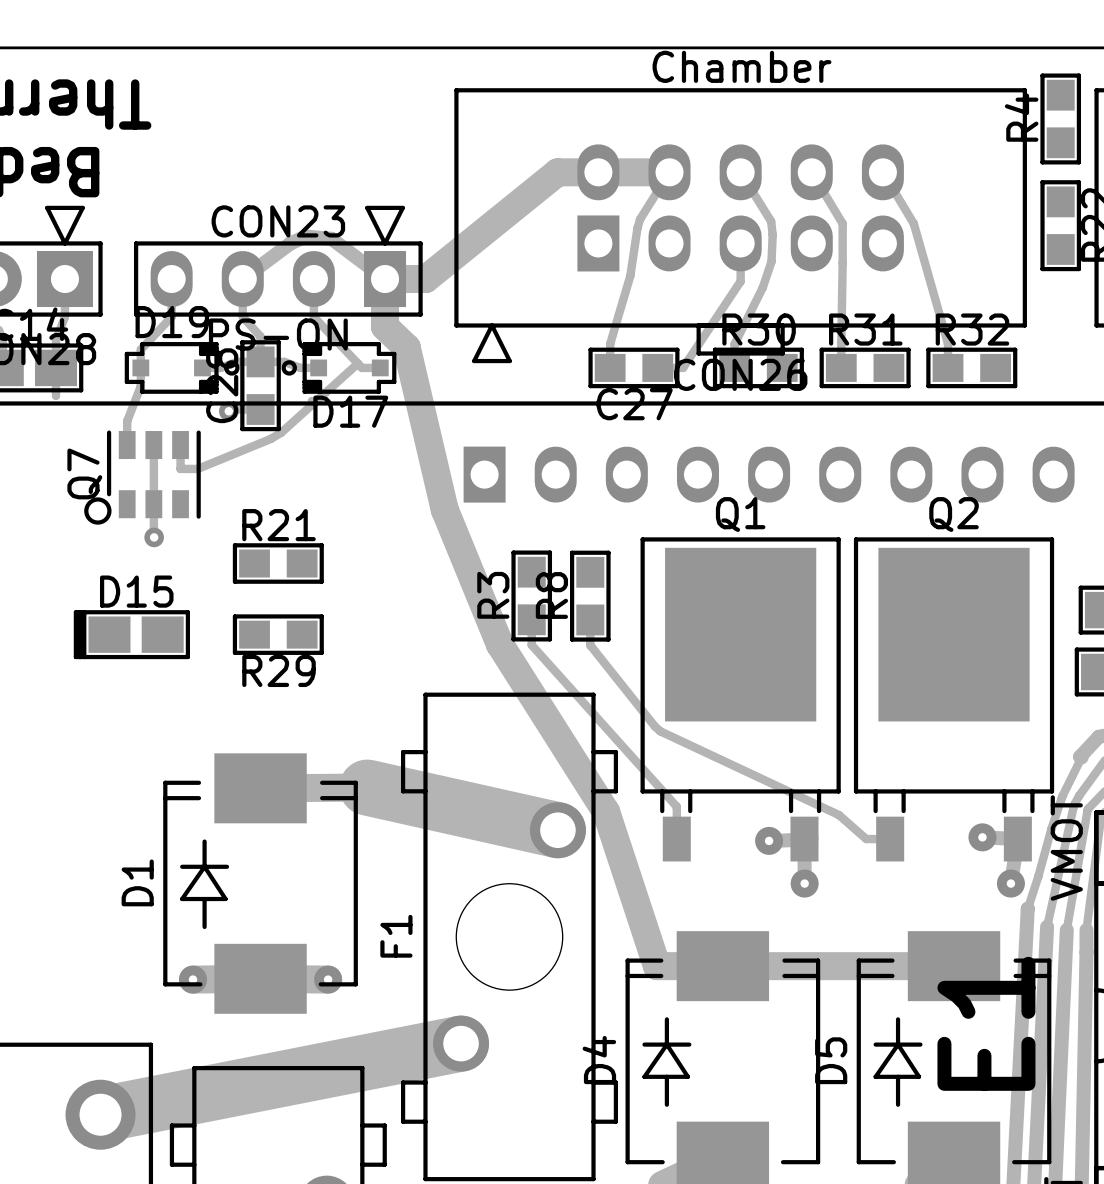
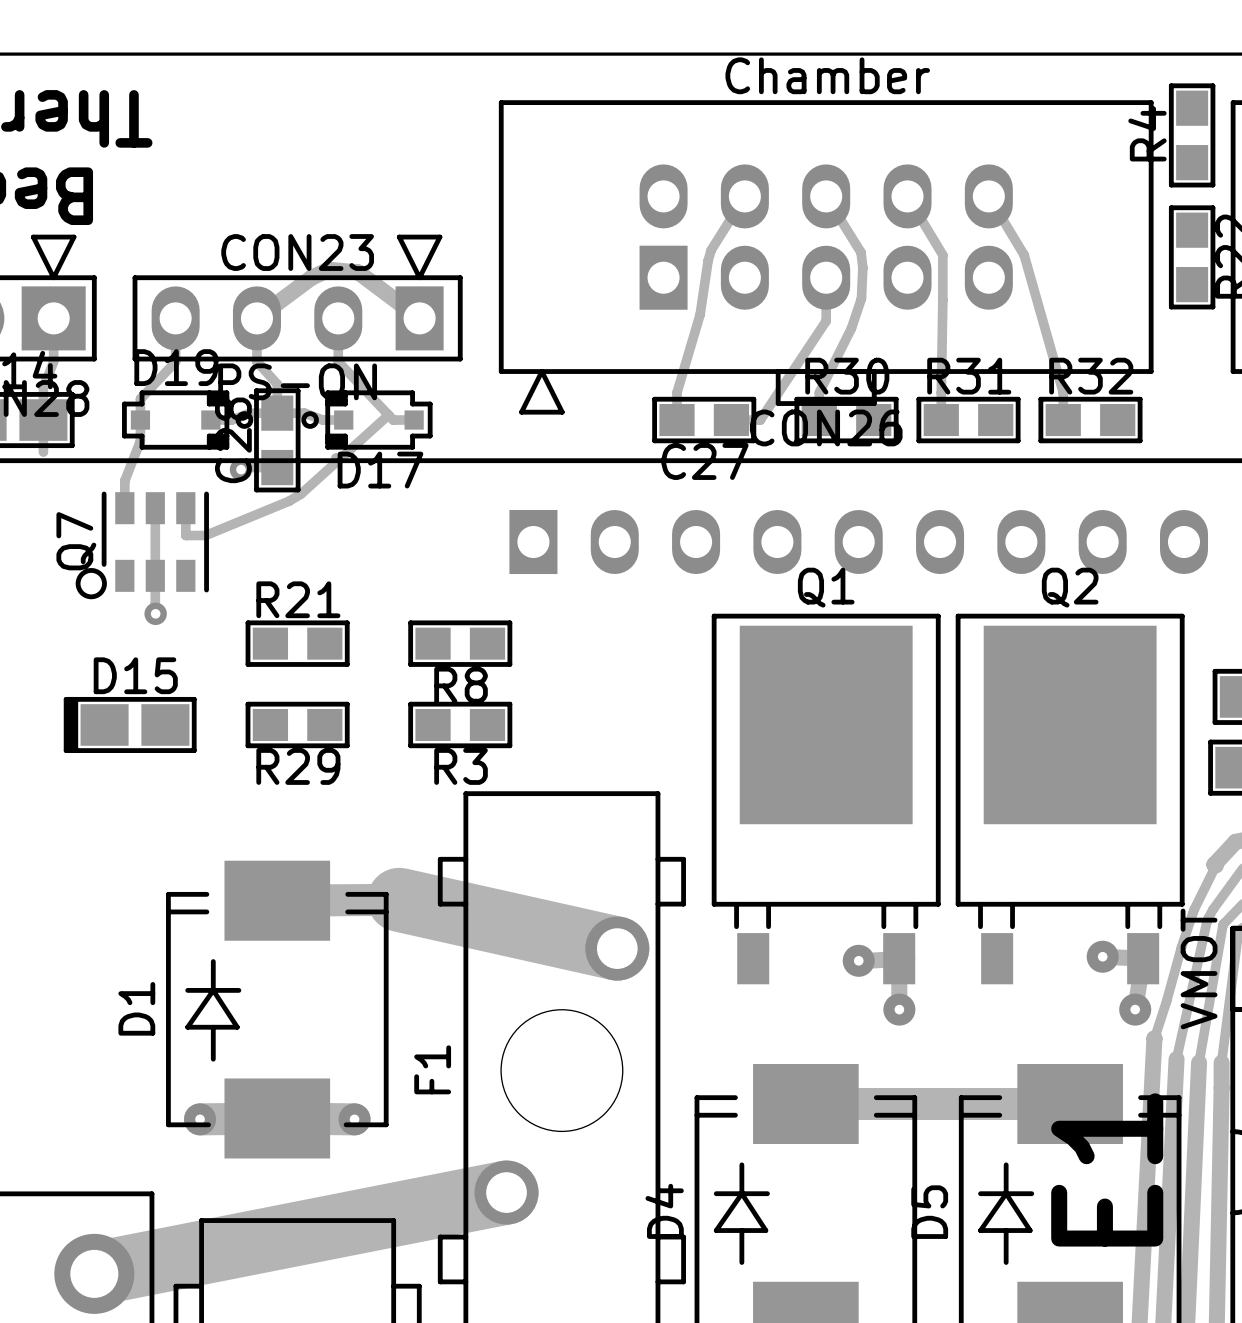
track: (669, 172) (557, 172) (425, 279) (385, 279) (385, 326) (406, 347) (444, 509) (499, 644) (606, 812) (656, 966) (722, 966) -> none
R3 rotation: 0° (531, 595) -> 90° counterclockwise (460, 724)
R3 position: (531, 595) -> (460, 724)
R8 rotation: 0° (590, 596) -> 90° counterclockwise (460, 643)
R8 position: (590, 596) -> (460, 643)
track: (531, 619) (531, 645) (676, 806) (676, 839) -> none
track: (590, 619) (590, 645) (660, 731) (839, 815) (866, 839) (890, 839) -> none

